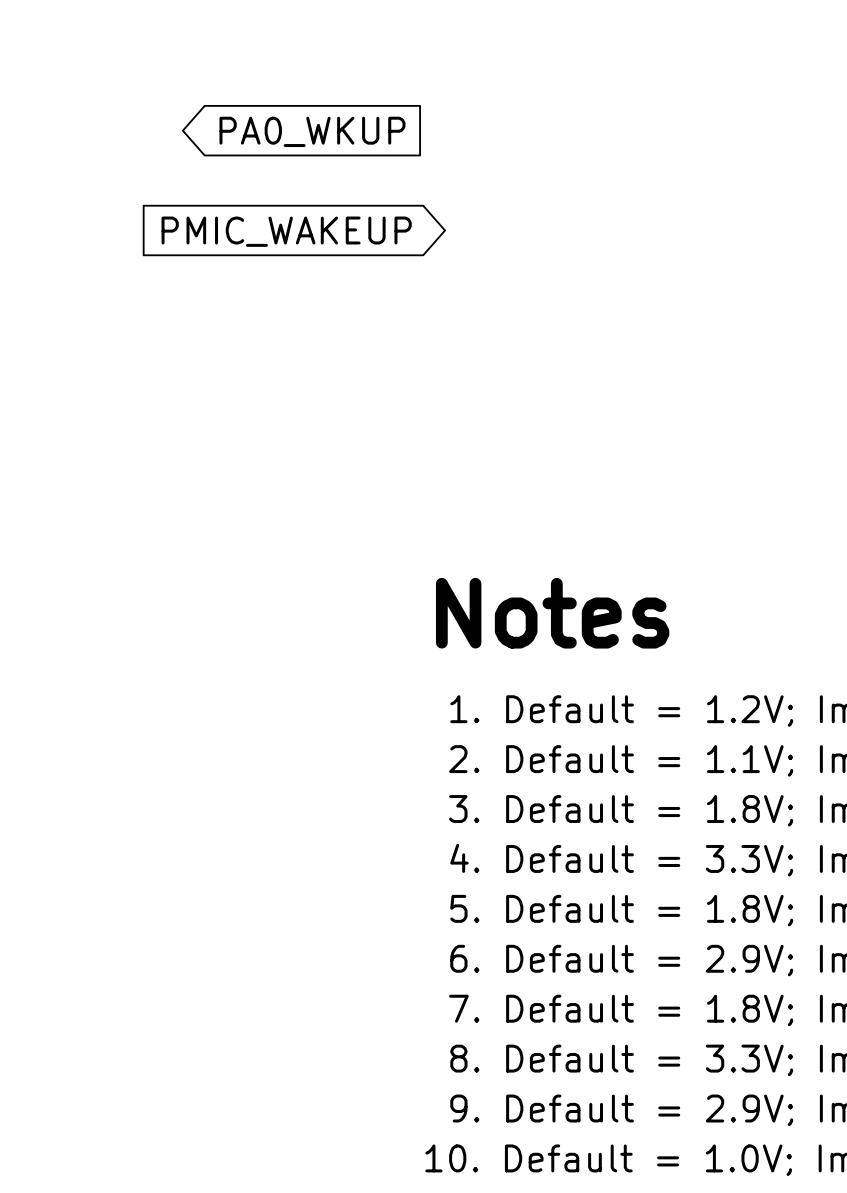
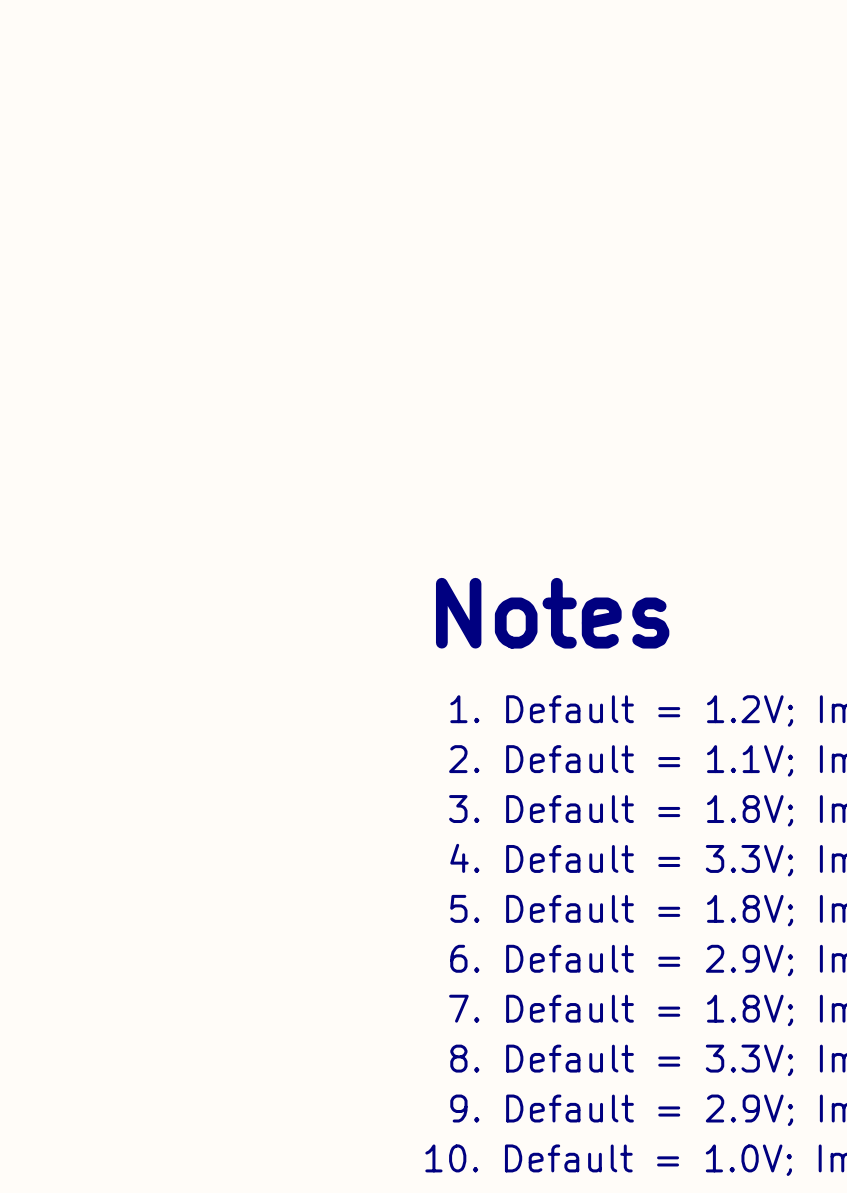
global label: PA0_WKUP (312, 131) -> none
global label: PMIC_WAKEUP (286, 231) -> none

